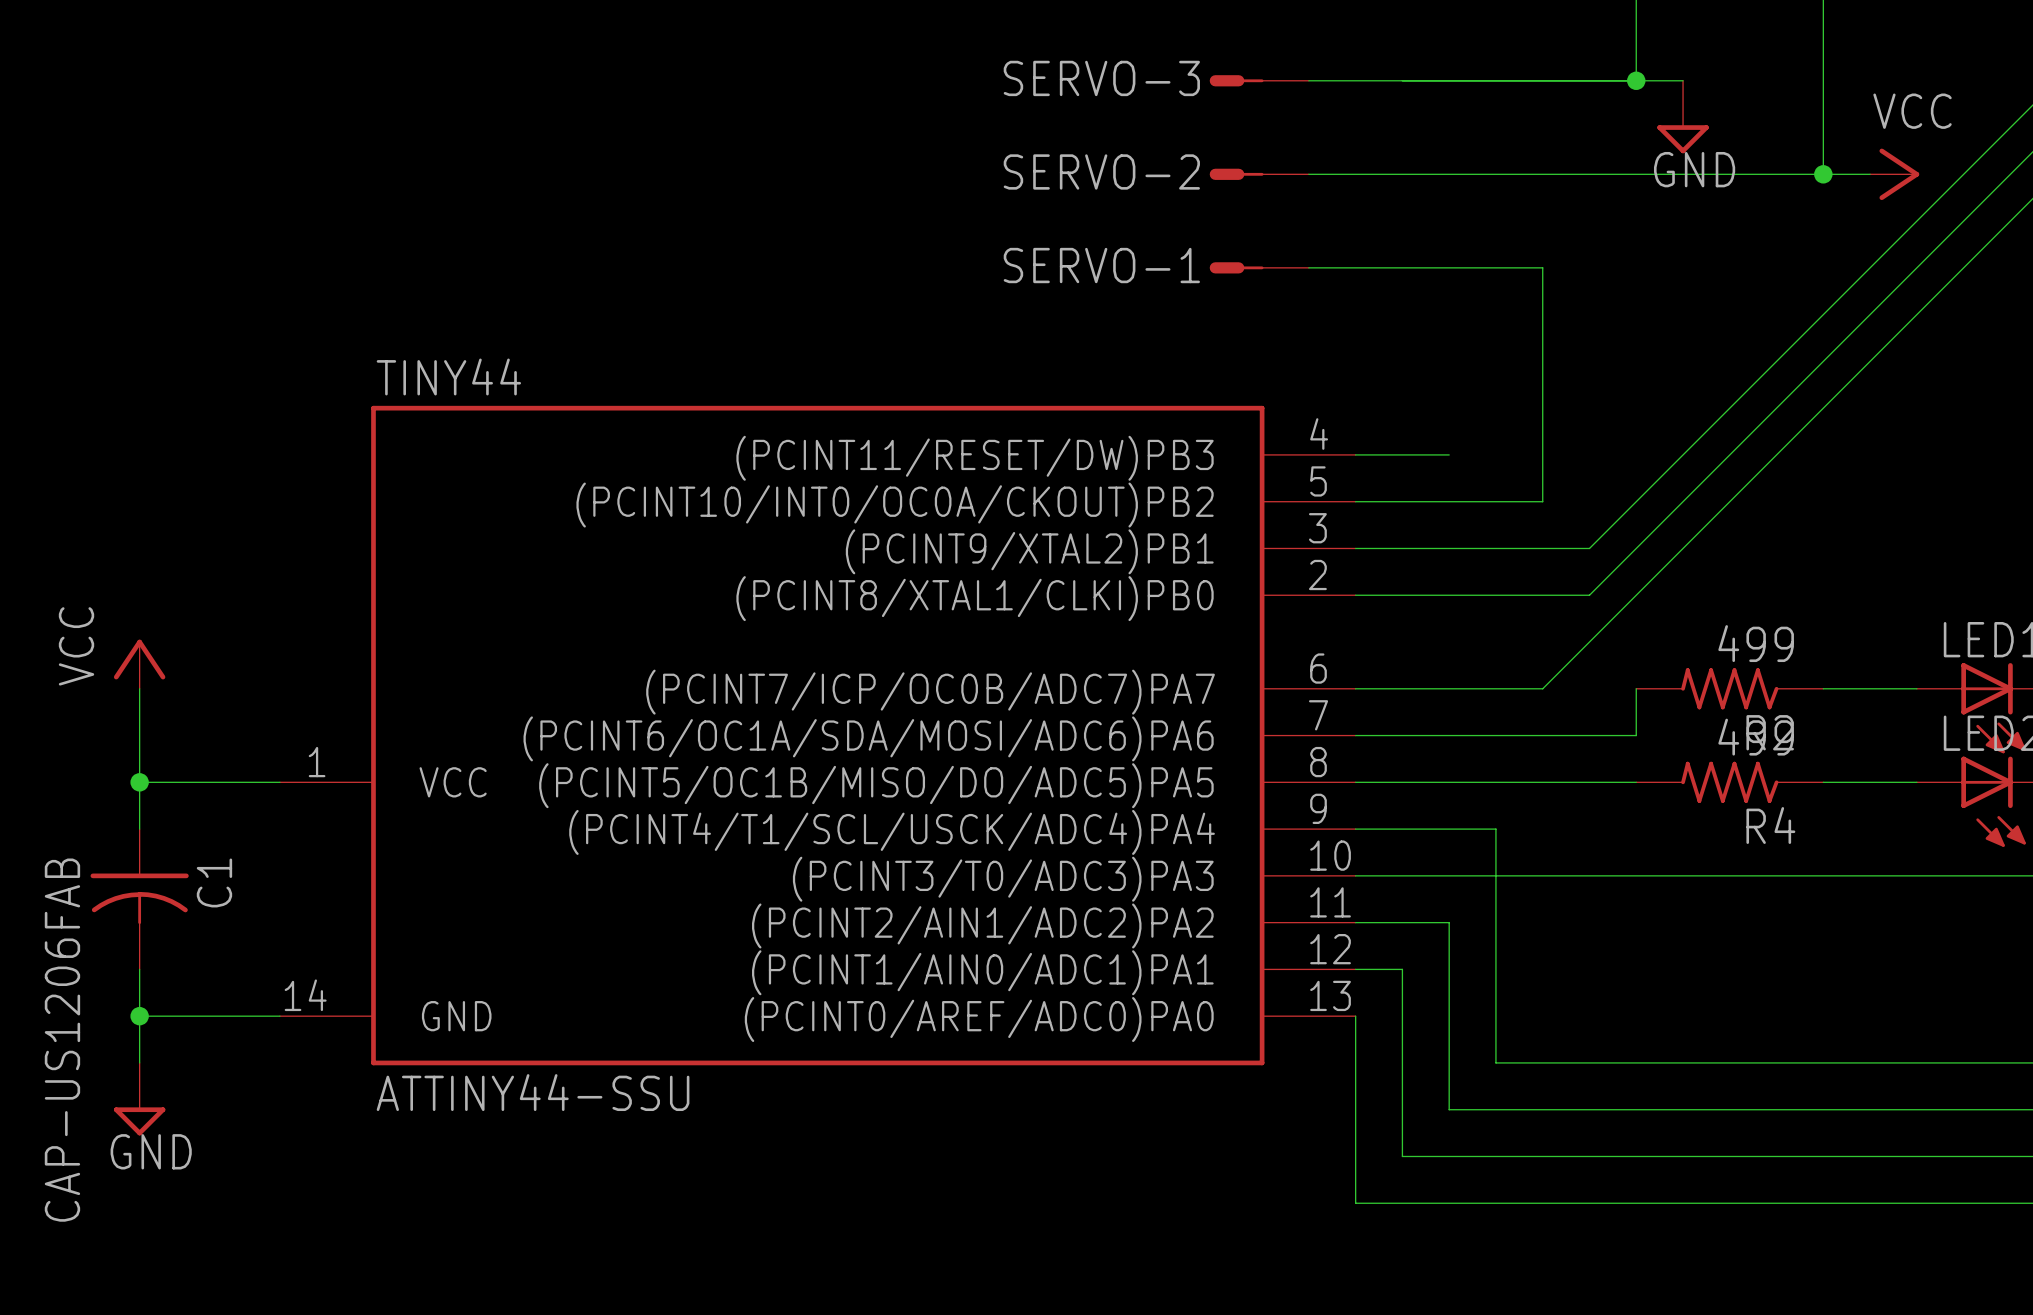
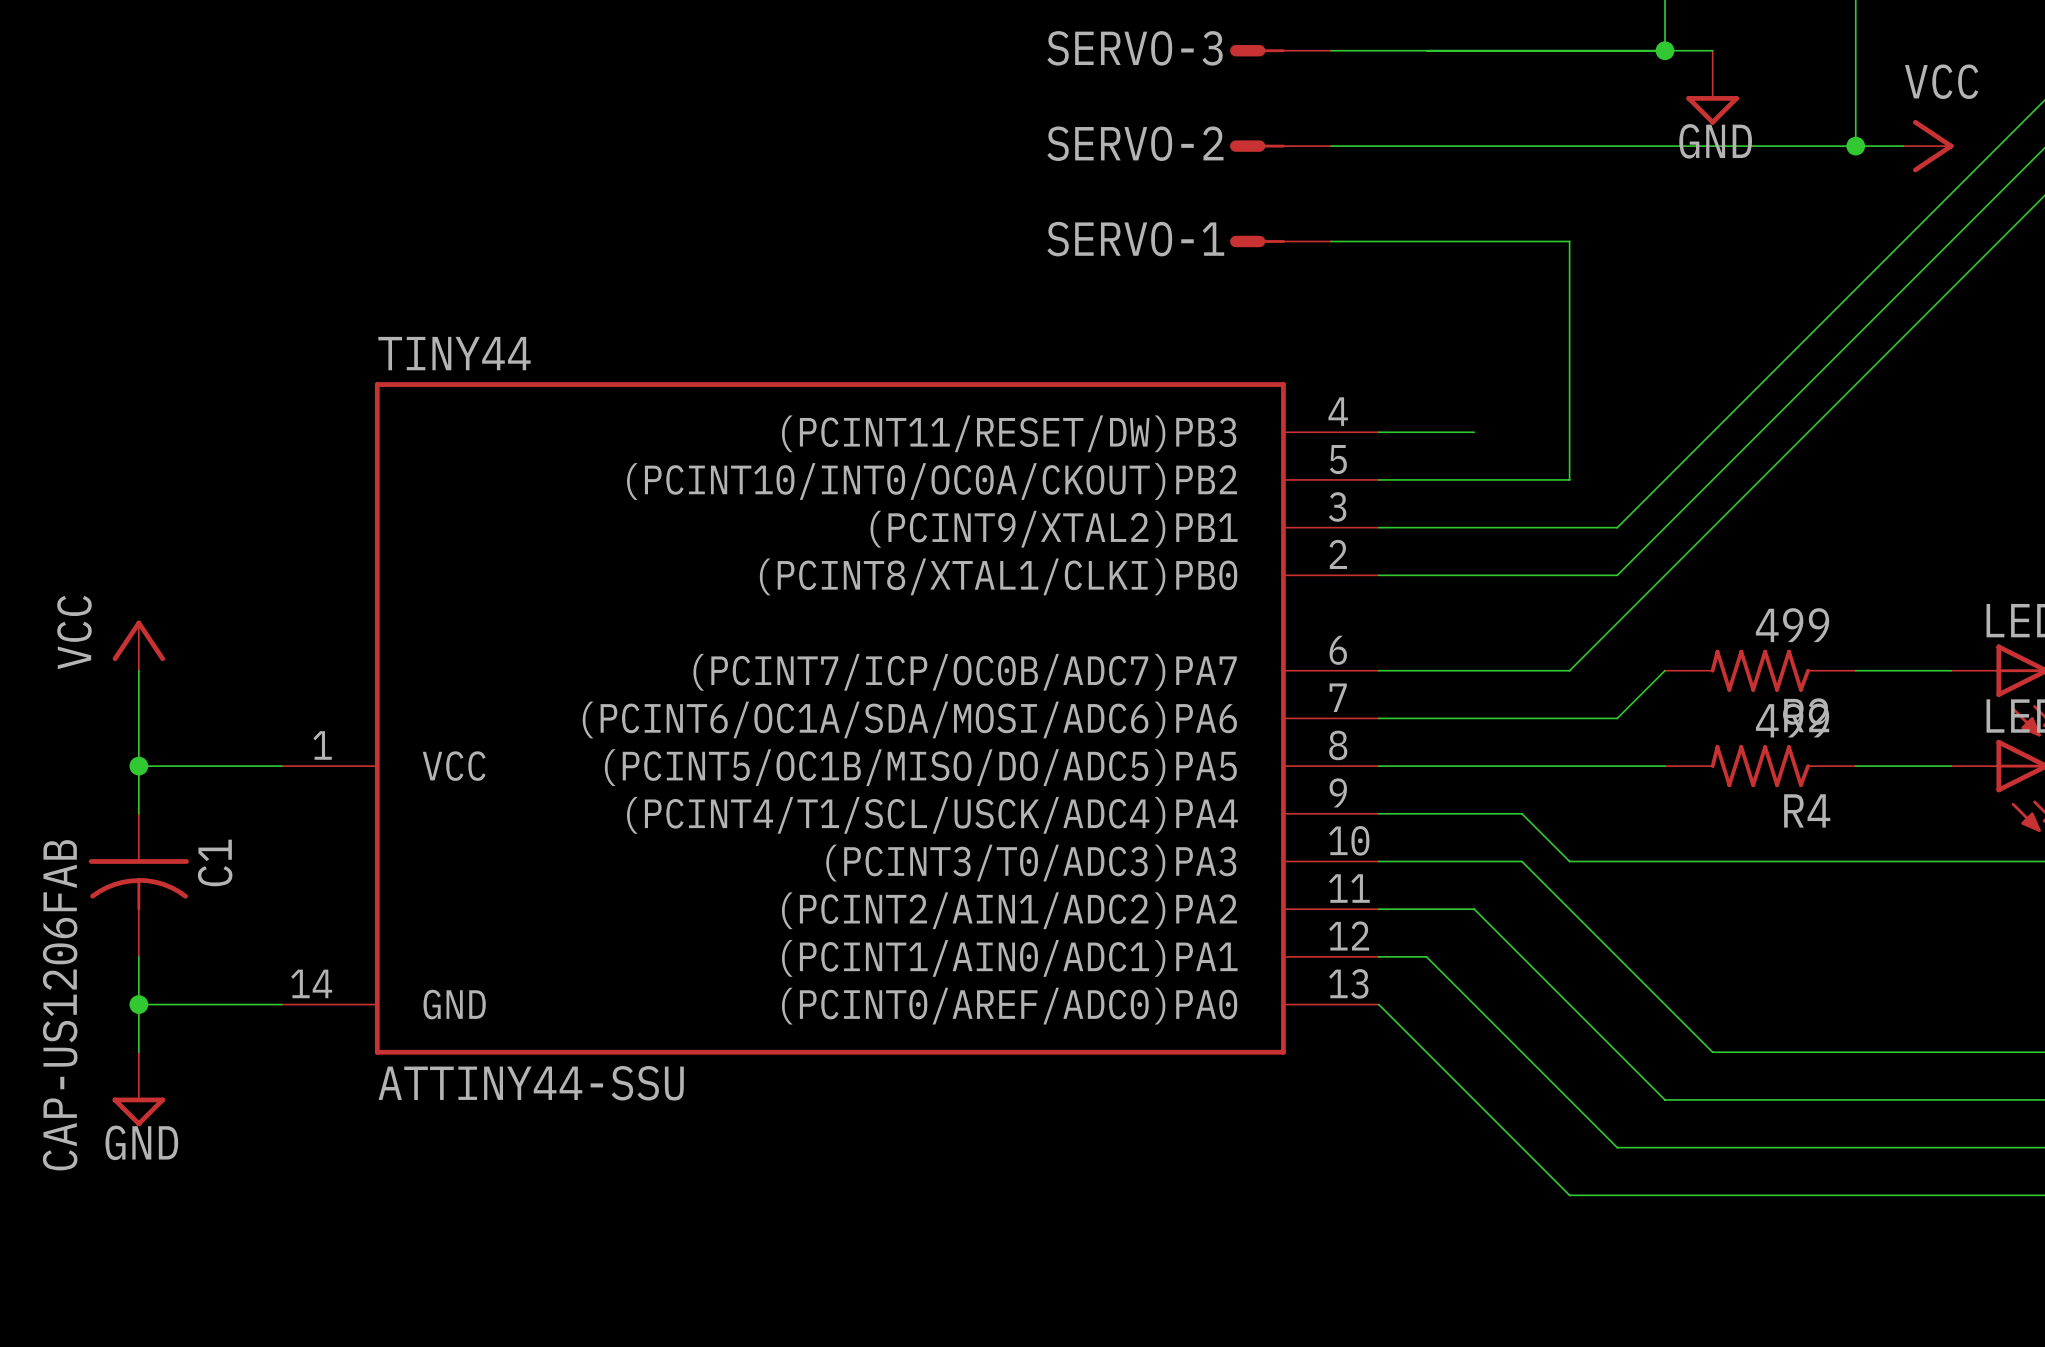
wire: (1636, 688) (1636, 735) (1589, 735) -> (1664, 670) (1617, 718)
wire: (1495, 829) (1495, 1062) (1683, 1062) -> (1521, 861) (1712, 1052)
wire: (1495, 875) (1542, 875) -> (1521, 813) (1569, 861)
wire: (1449, 922) (1449, 1109) (1636, 1109) -> (1474, 909) (1664, 1099)
wire: (1402, 969) (1402, 1156) (1589, 1156) -> (1426, 956) (1617, 1147)
wire: (1355, 1016) (1355, 1203) (1542, 1203) -> (1378, 1004) (1569, 1195)

